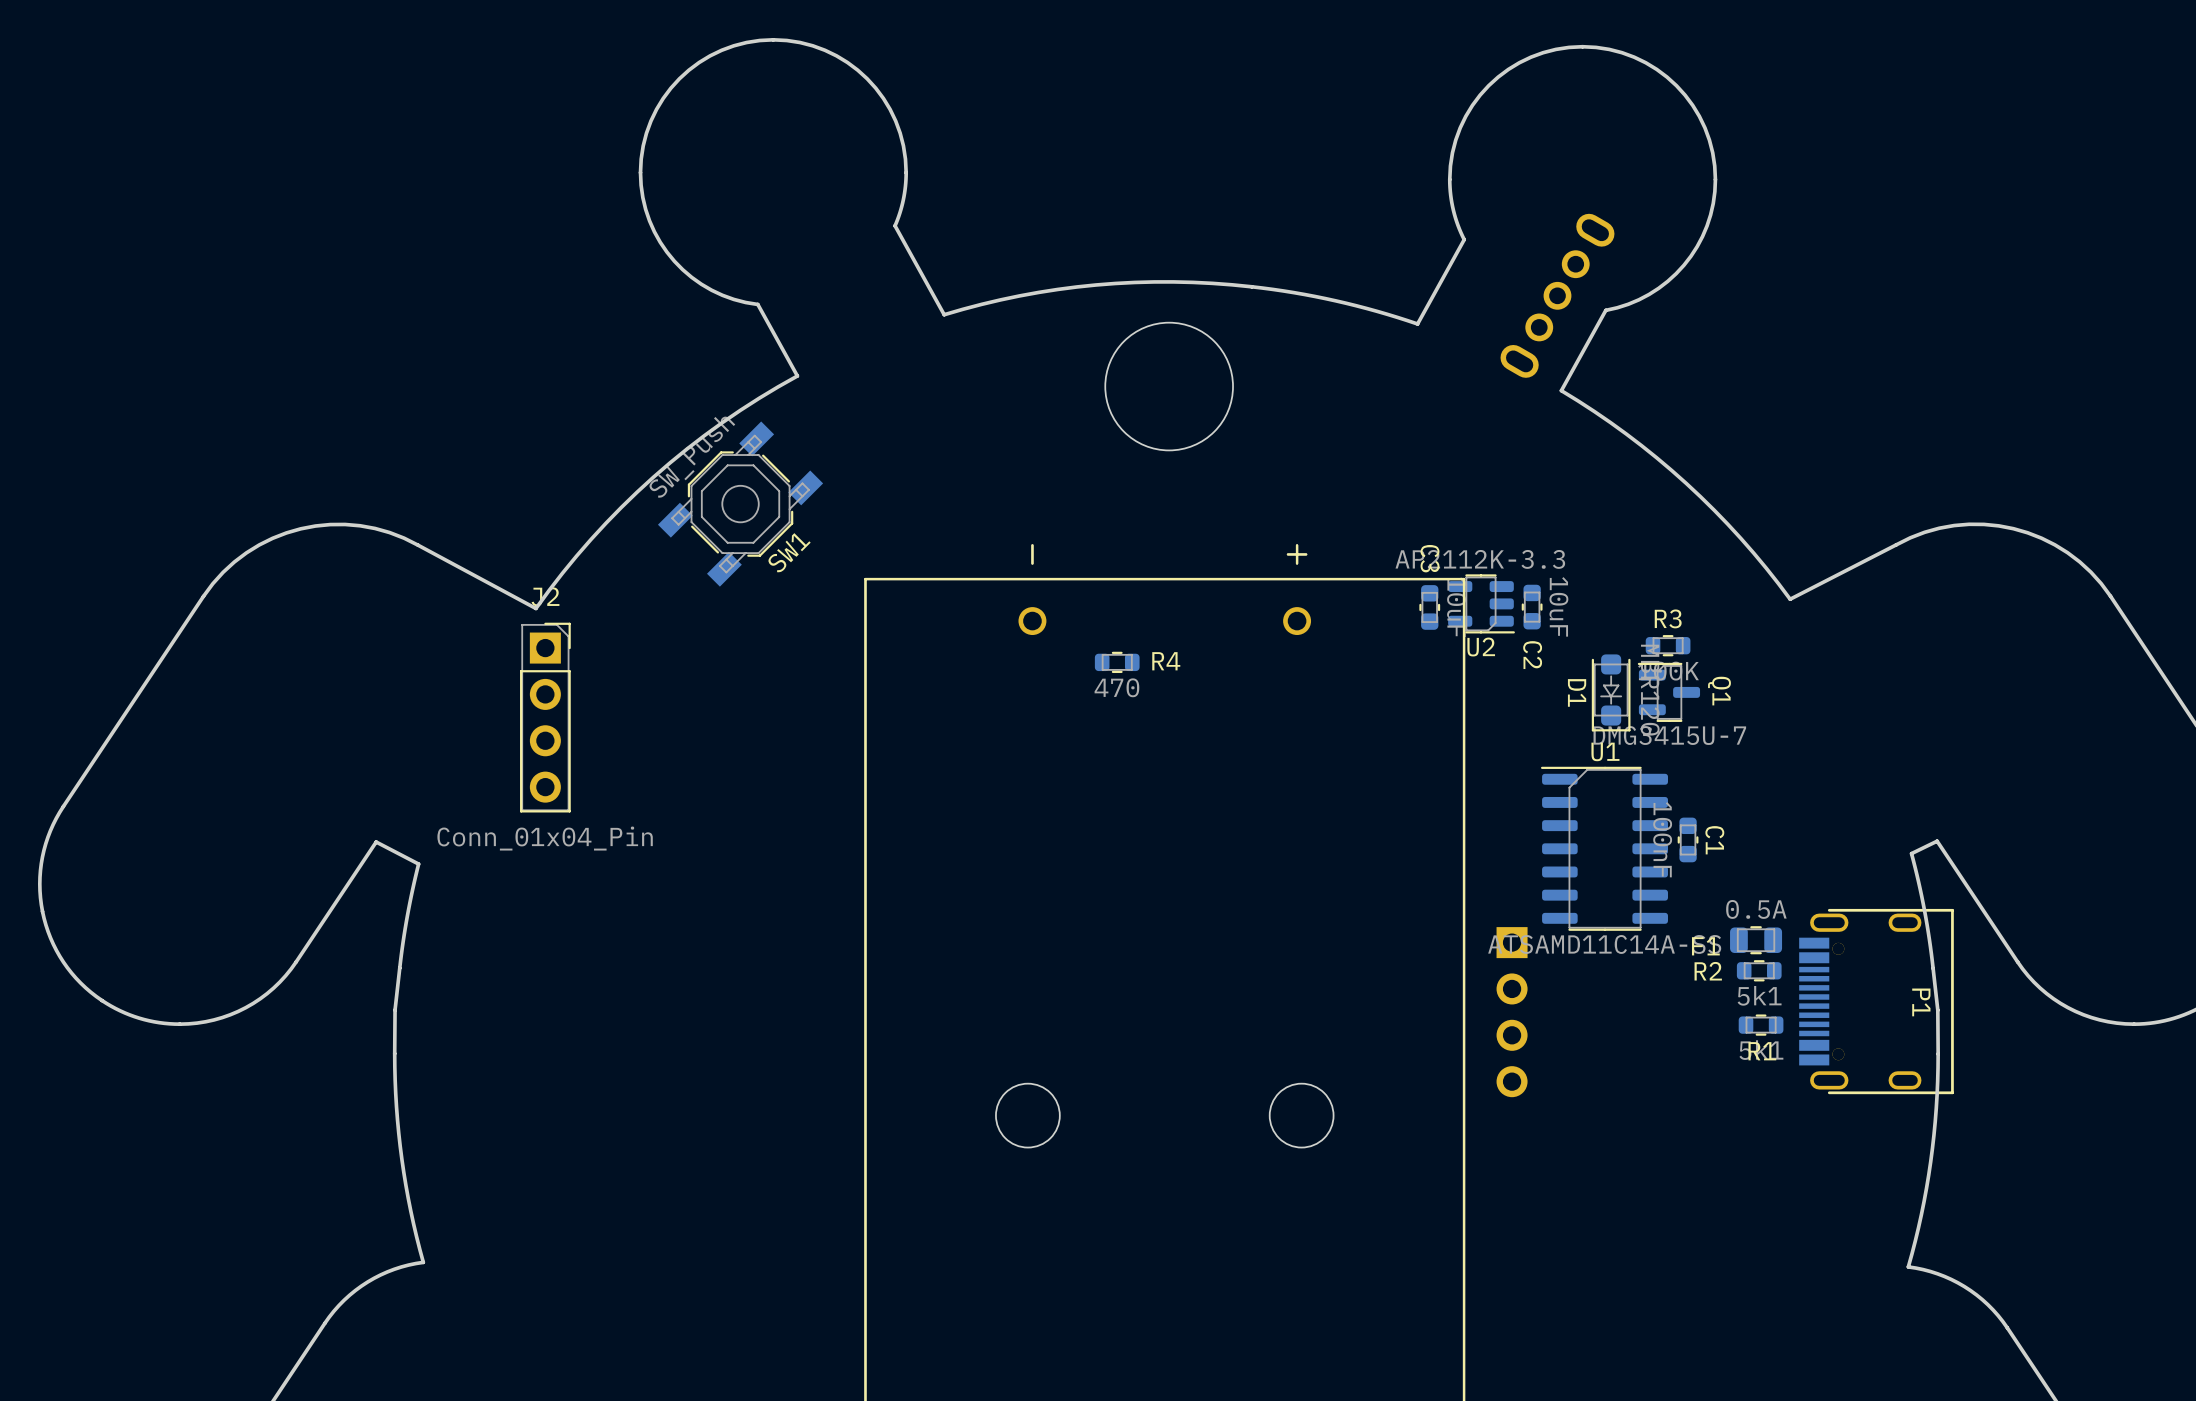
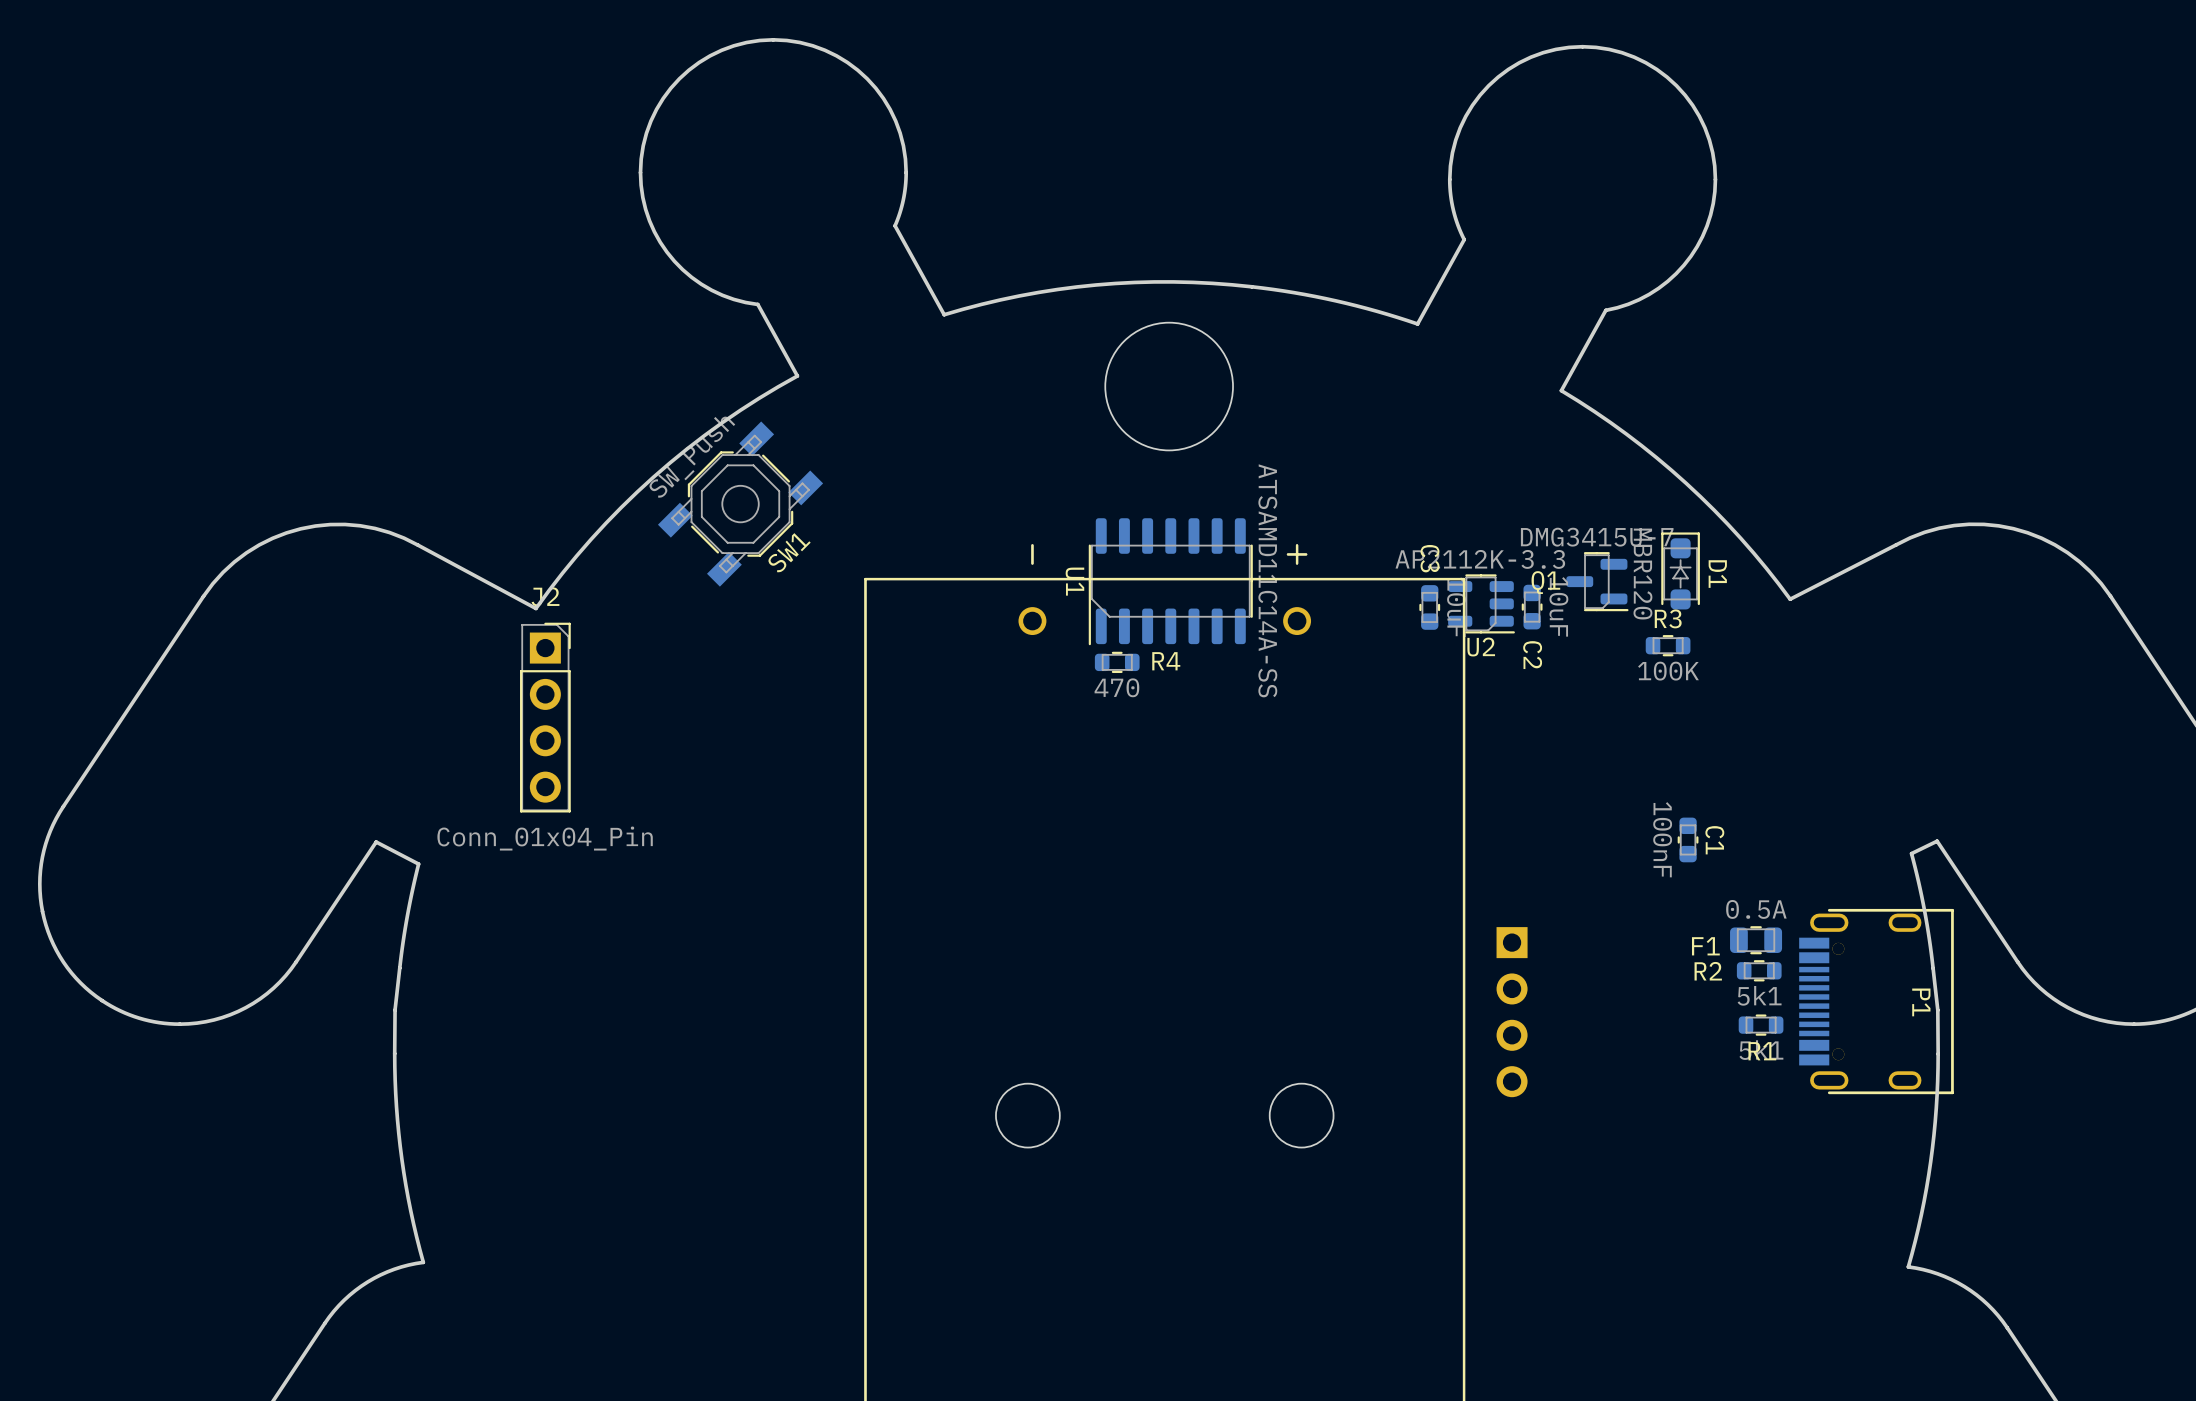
part: (1557, 295) -> none
D1 rotation: 0° (1611, 692) -> 180° (1680, 570)
D1 position: (1611, 692) -> (1680, 570)
Q1 rotation: 0° (1668, 692) -> 180° (1597, 581)
Q1 position: (1668, 692) -> (1597, 581)
U1 rotation: 0° (1604, 848) -> 90° counterclockwise (1170, 581)
U1 position: (1604, 848) -> (1170, 581)

